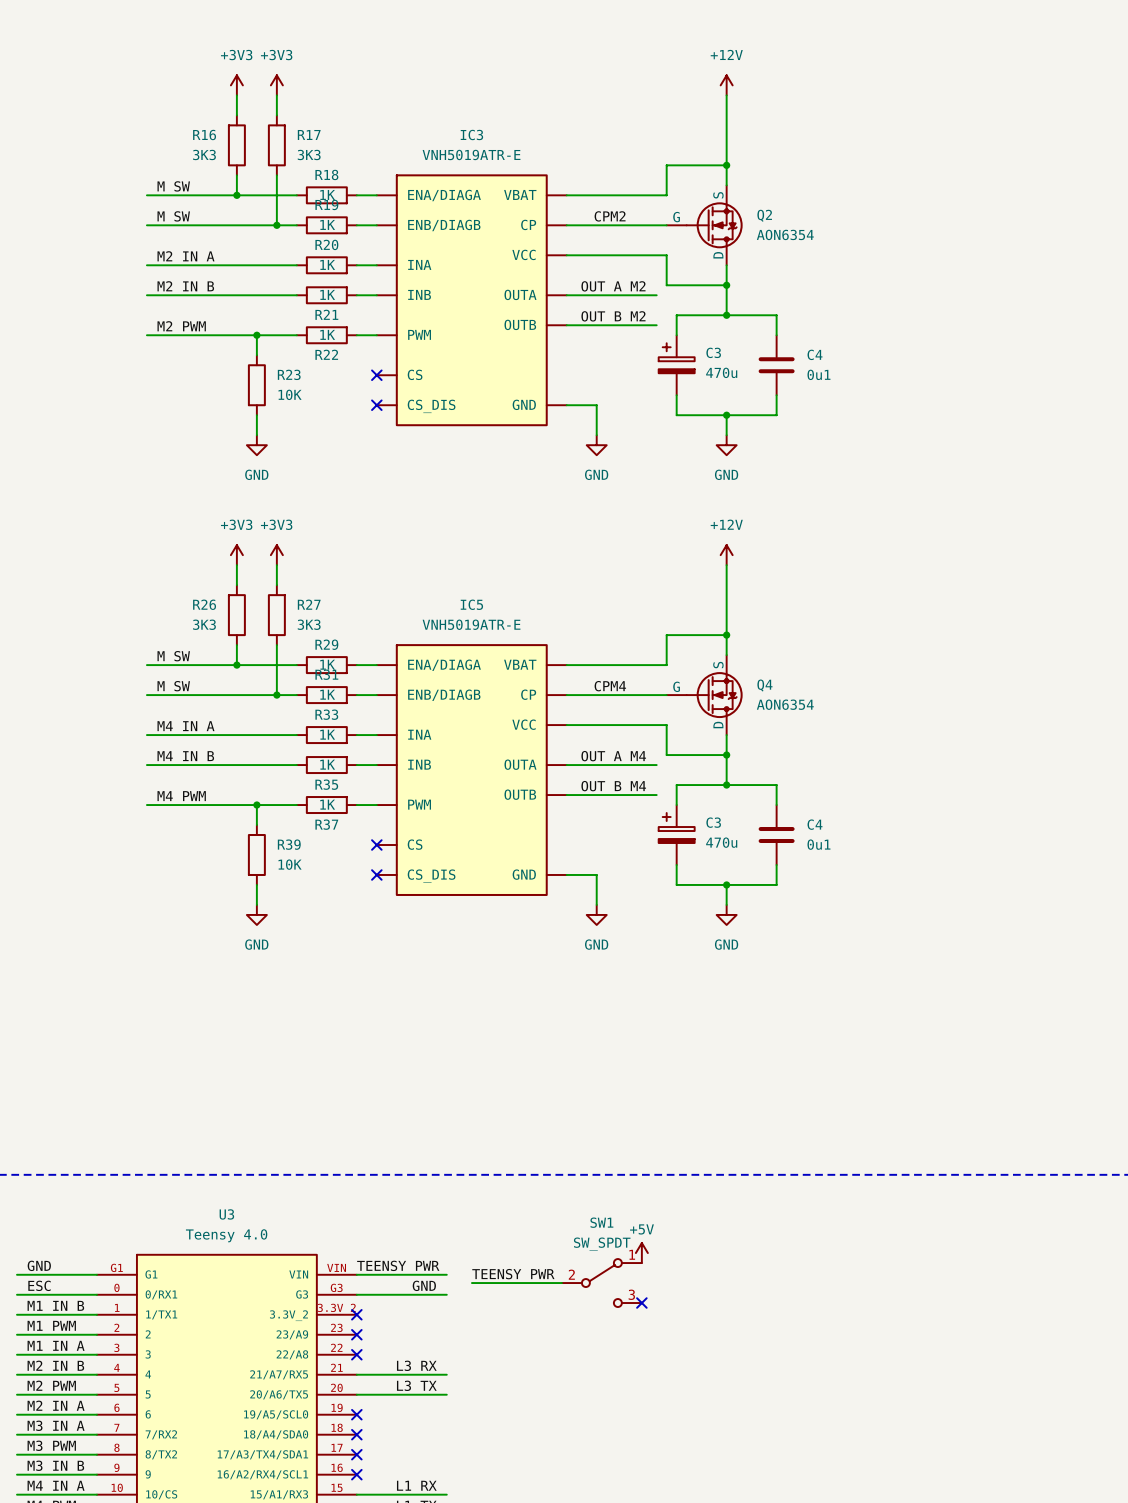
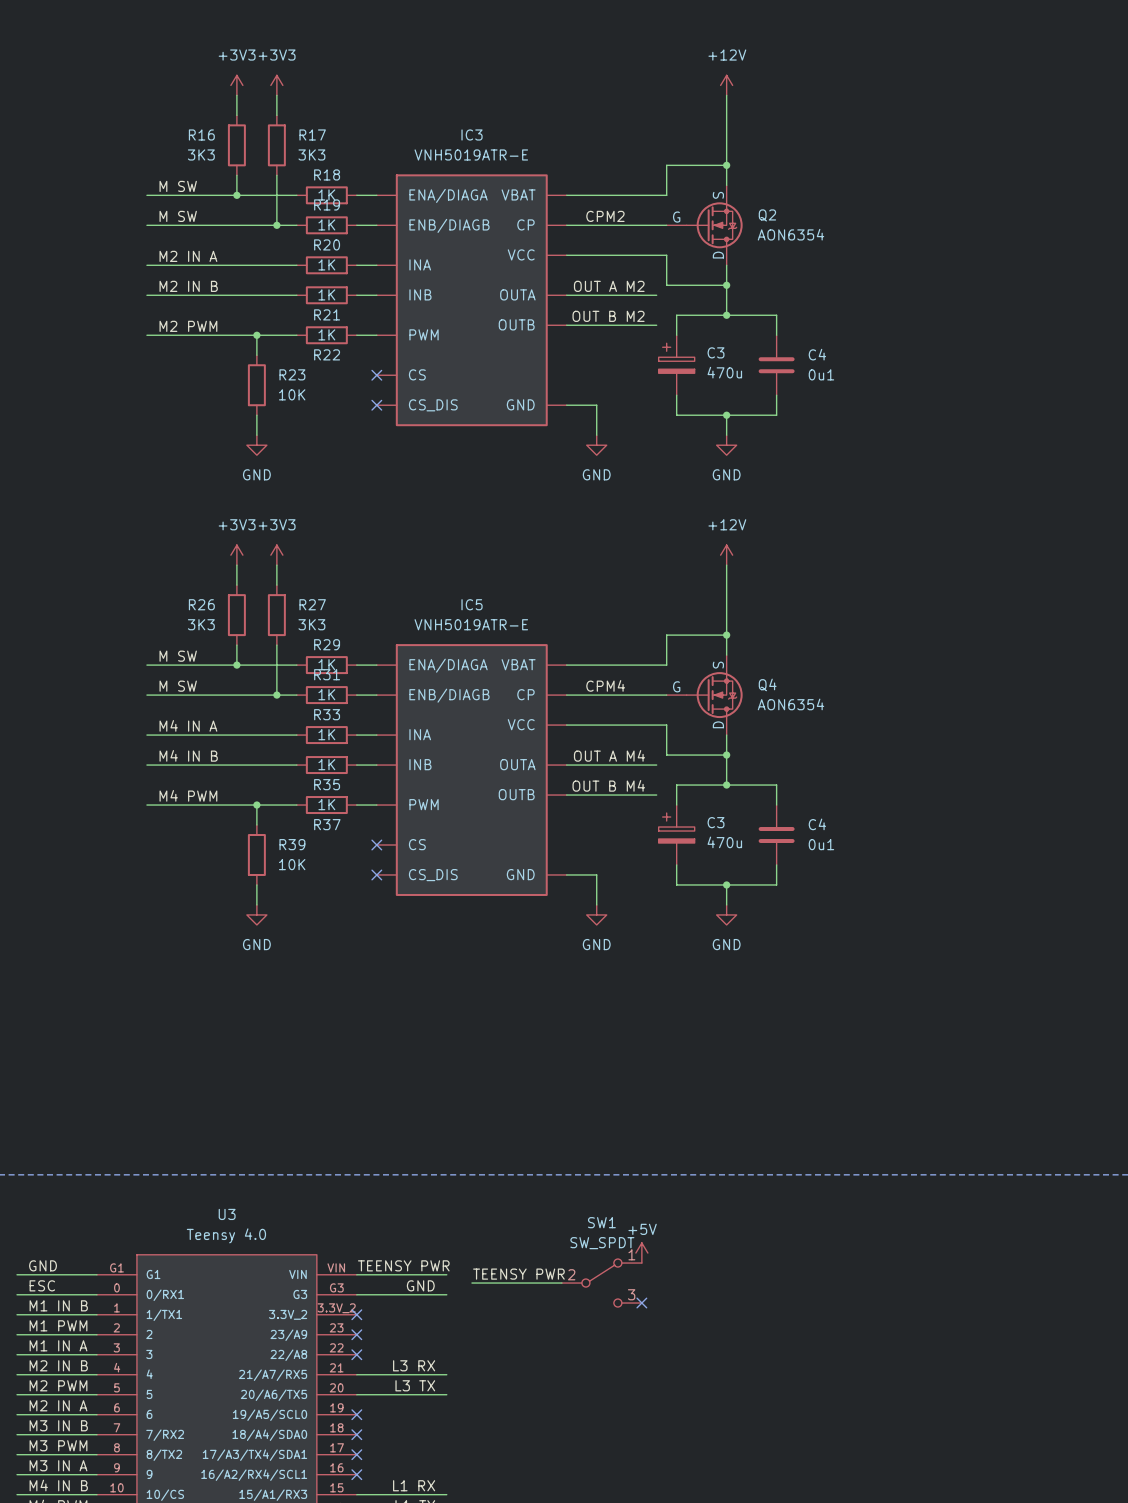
label: M3 IN A (56, 1425) -> M3 IN B (58, 1425)
label: M3 IN B (55, 1465) -> M3 IN A (58, 1465)
label: M4 IN A (56, 1485) -> M4 IN B (58, 1485)

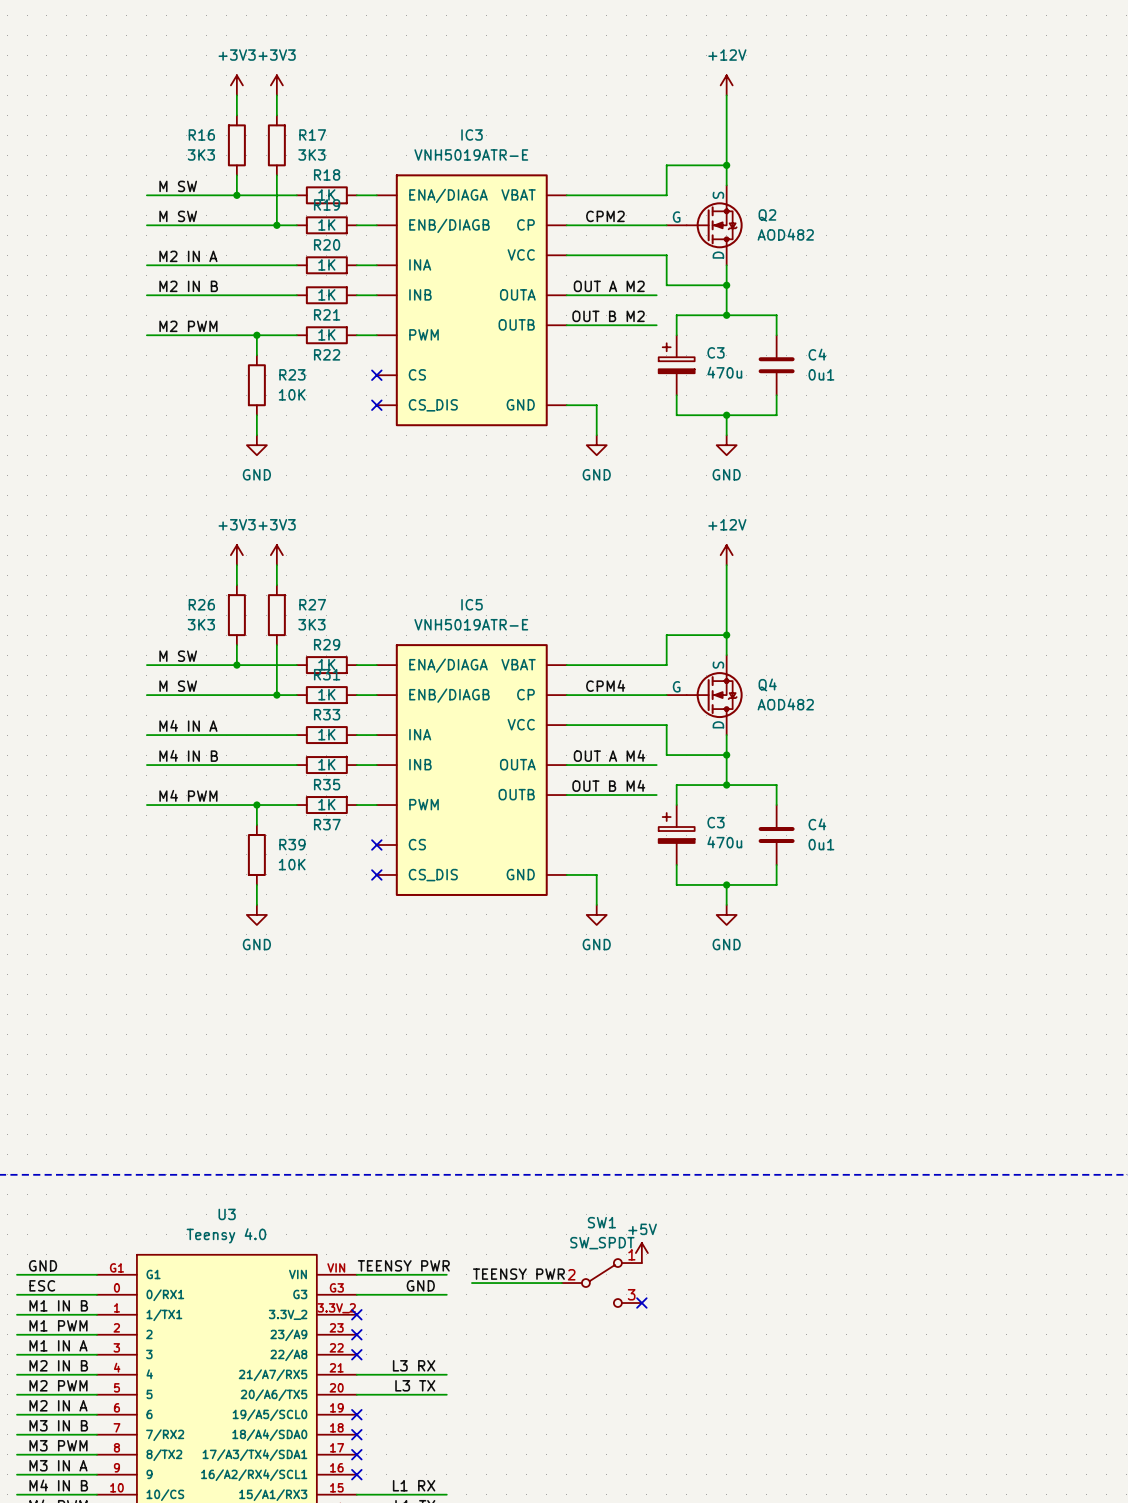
Q2 value: AON6354 (790, 234) -> AOD482 (785, 234)
Q4 value: AON6354 (790, 704) -> AOD482 (785, 704)

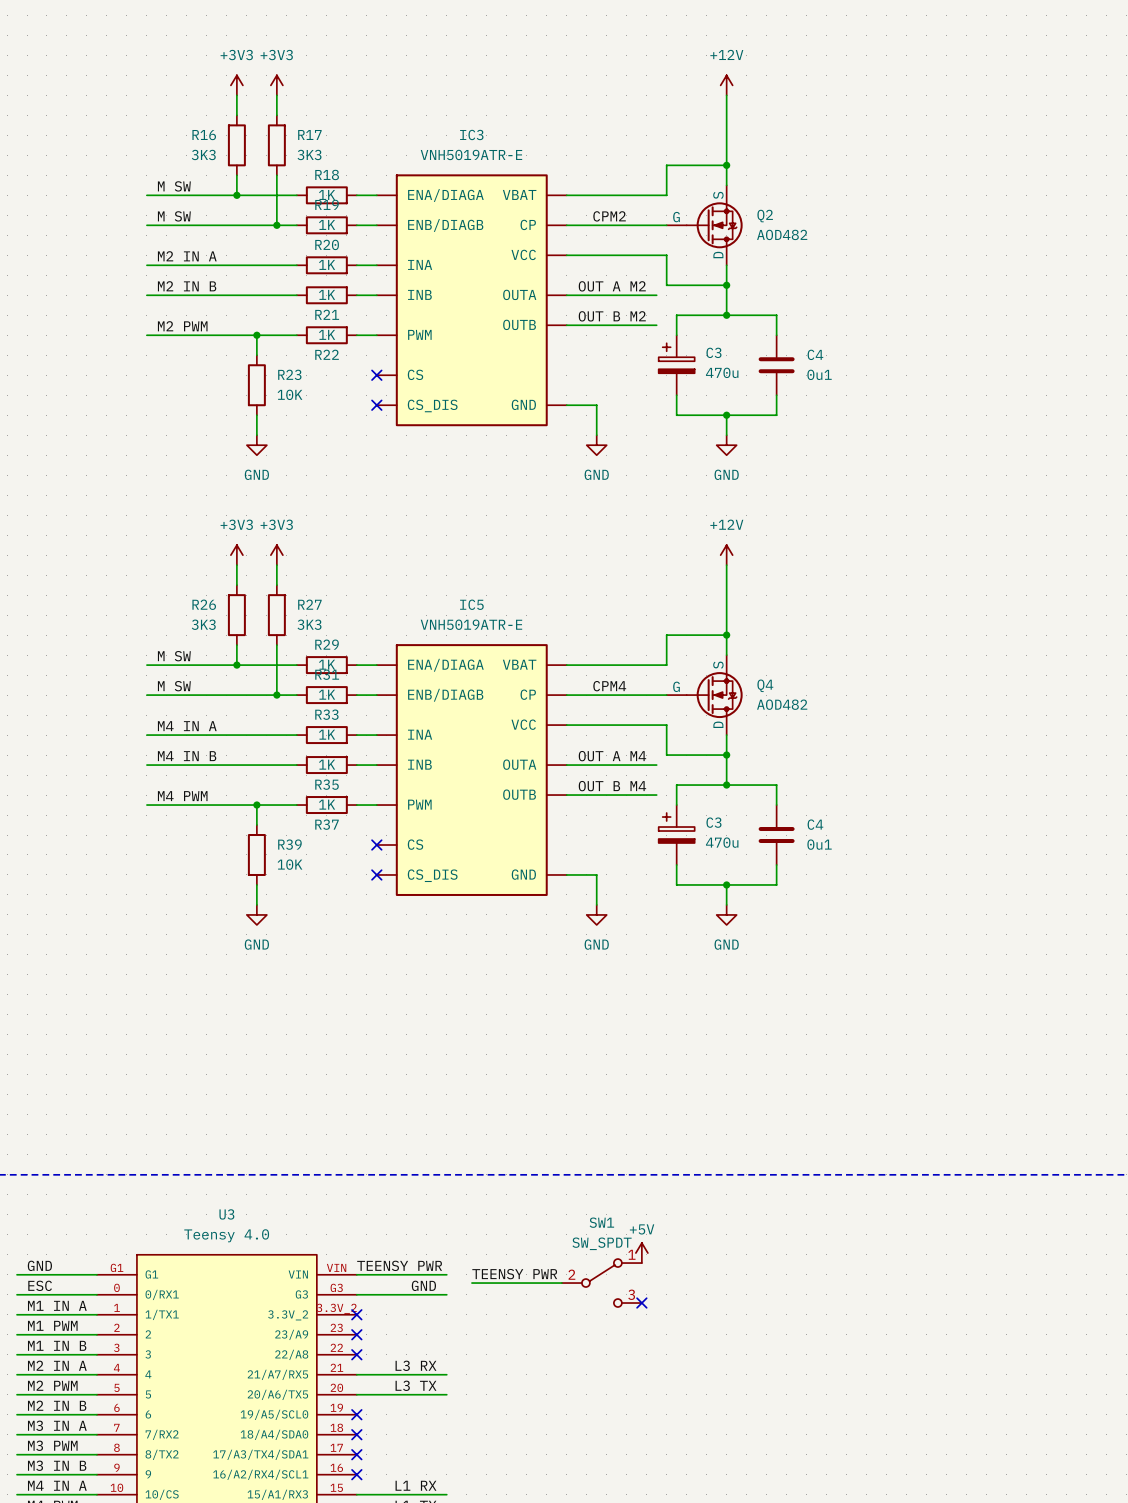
label: M1 IN B (58, 1305) -> M1 IN A (57, 1305)
label: M1 IN A (58, 1345) -> M1 IN B (57, 1345)
label: M2 IN B (58, 1365) -> M2 IN A (57, 1365)
label: M2 IN A (58, 1405) -> M2 IN B (57, 1405)
label: M3 IN B (58, 1425) -> M3 IN A (57, 1425)
label: M3 IN A (58, 1465) -> M3 IN B (57, 1465)
label: M4 IN B (58, 1485) -> M4 IN A (57, 1485)

